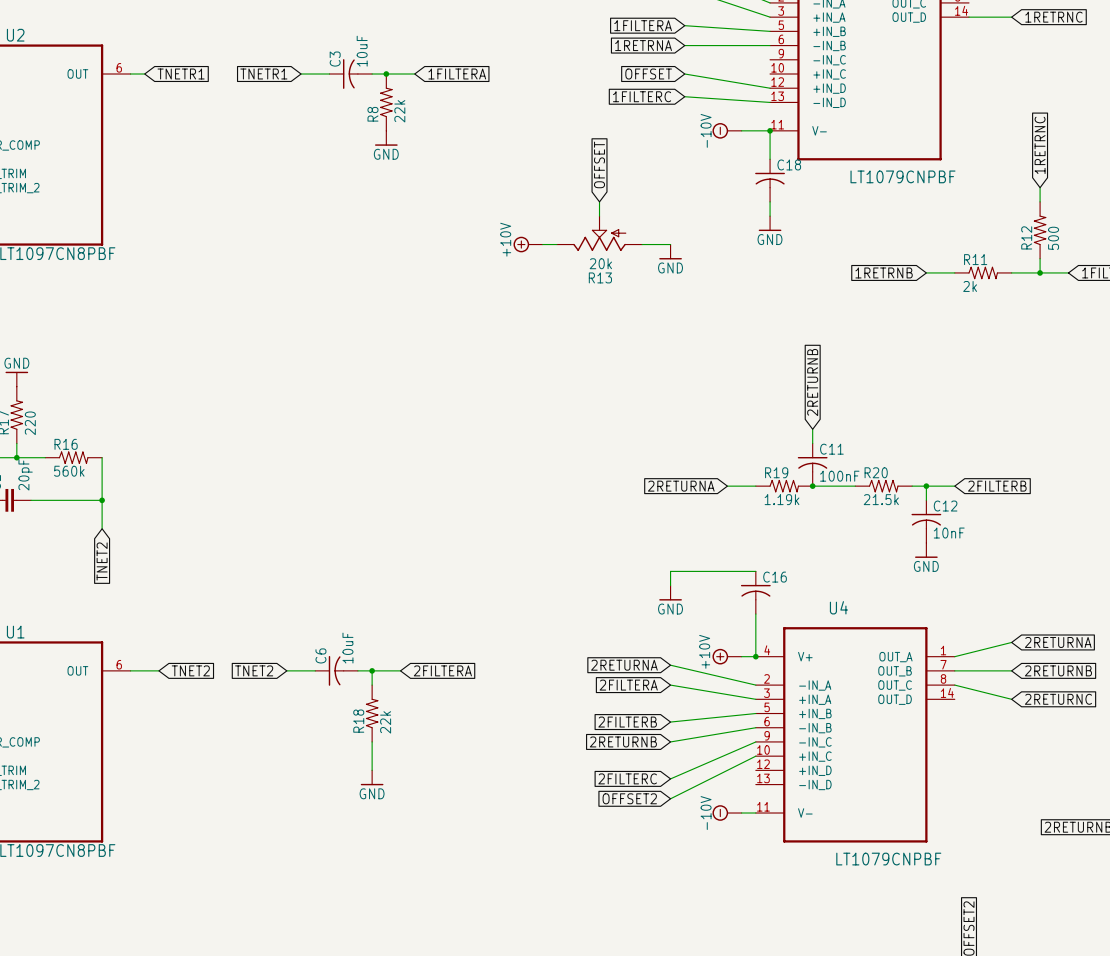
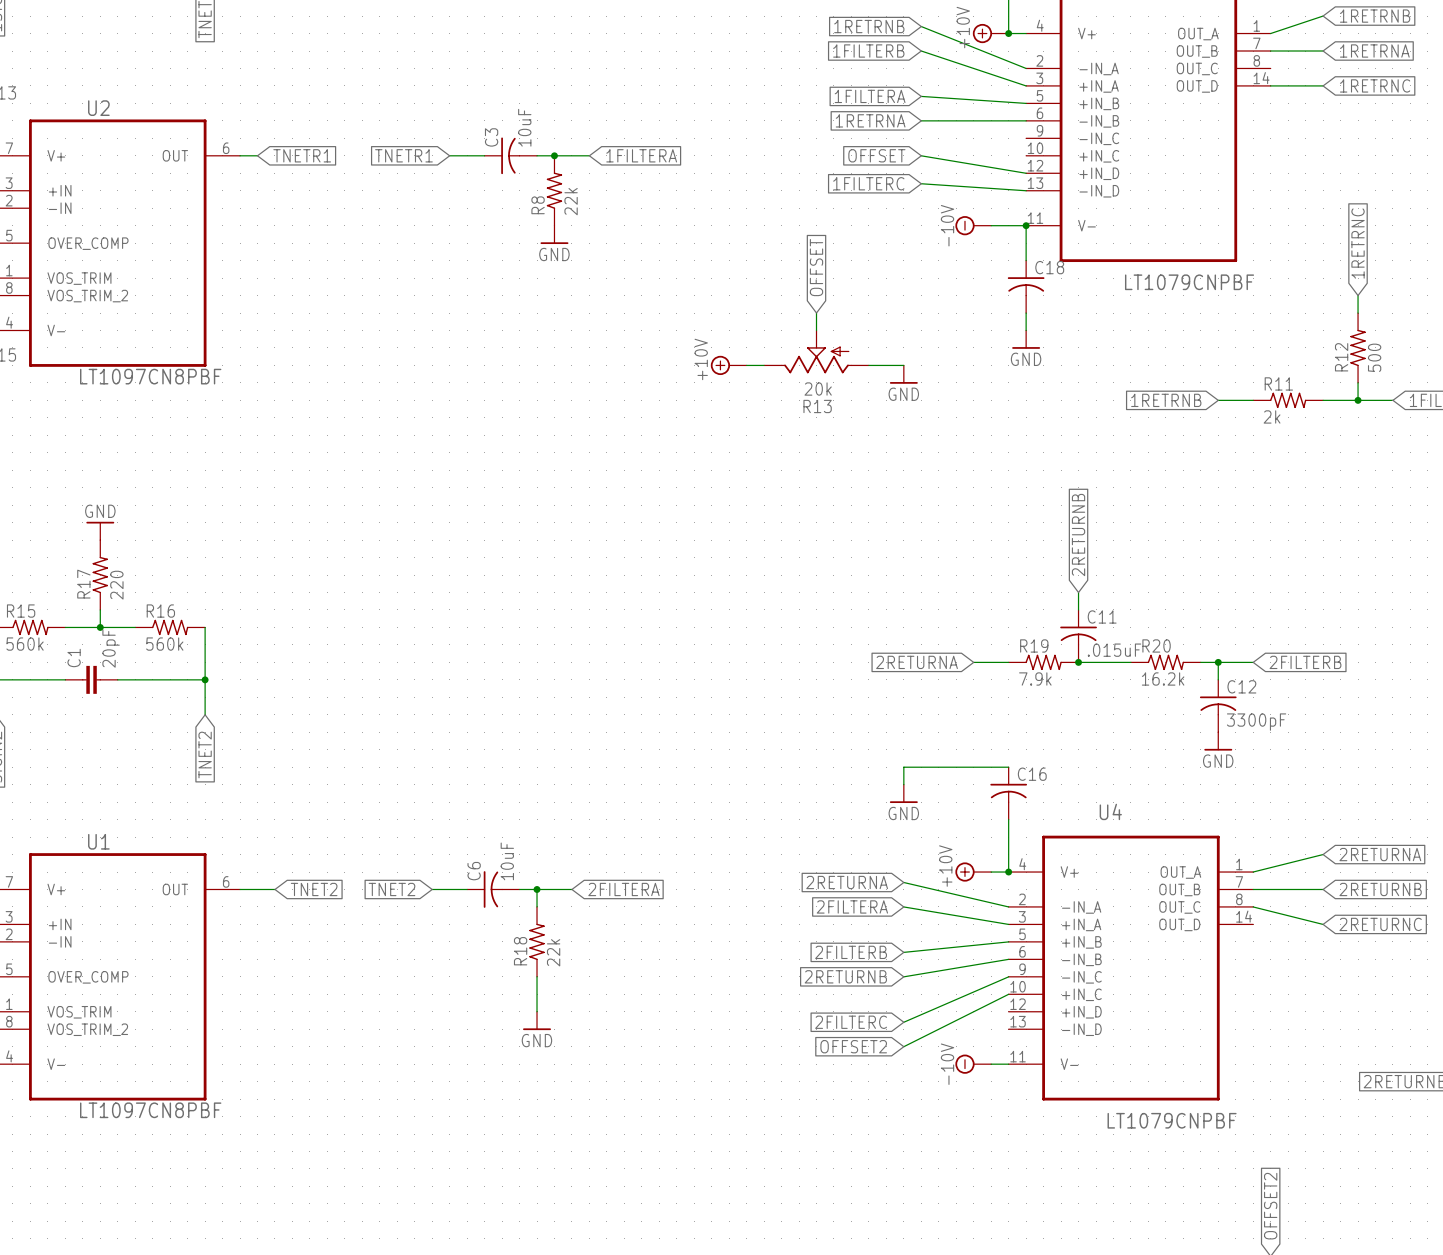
C11 value: 100nF (839, 476) -> .015uF (1114, 650)
R19 value: 1.19k (782, 499) -> 7.9k (1035, 678)
R20 value: 21.5k (881, 499) -> 16.2k (1163, 678)
C12 value: 10nF (949, 533) -> 3300pF (1256, 722)

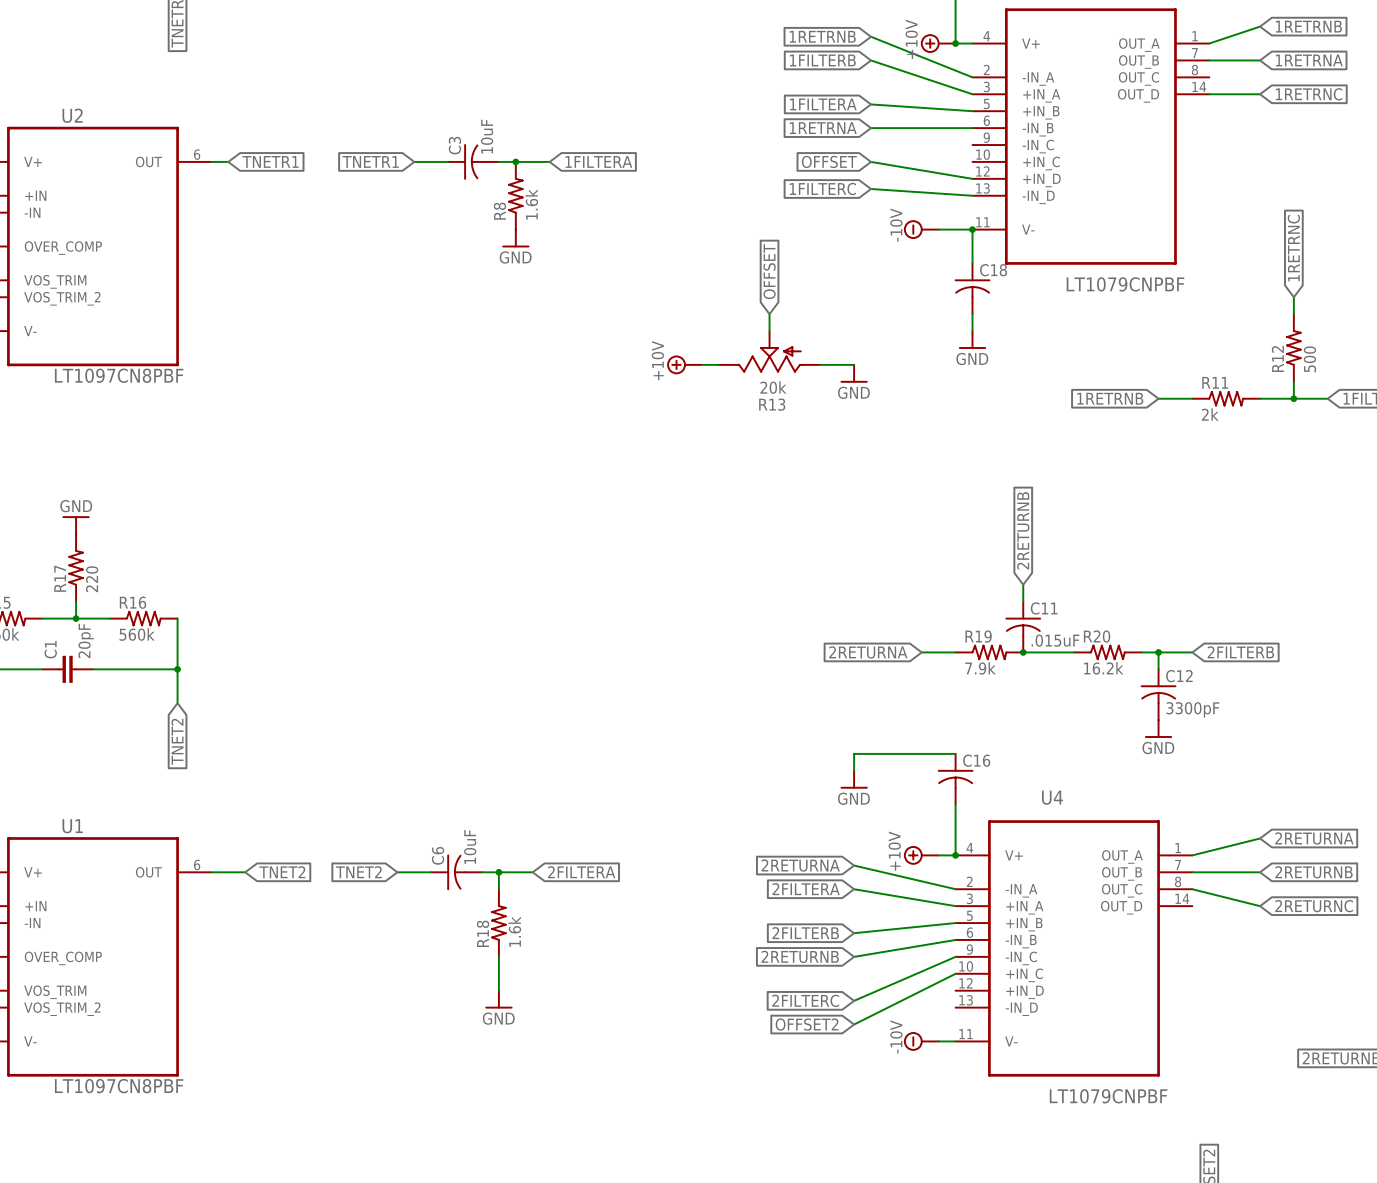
R8 value: 22k (571, 201) -> 1.6k (531, 204)
R18 value: 22k (553, 952) -> 1.6k (514, 931)

